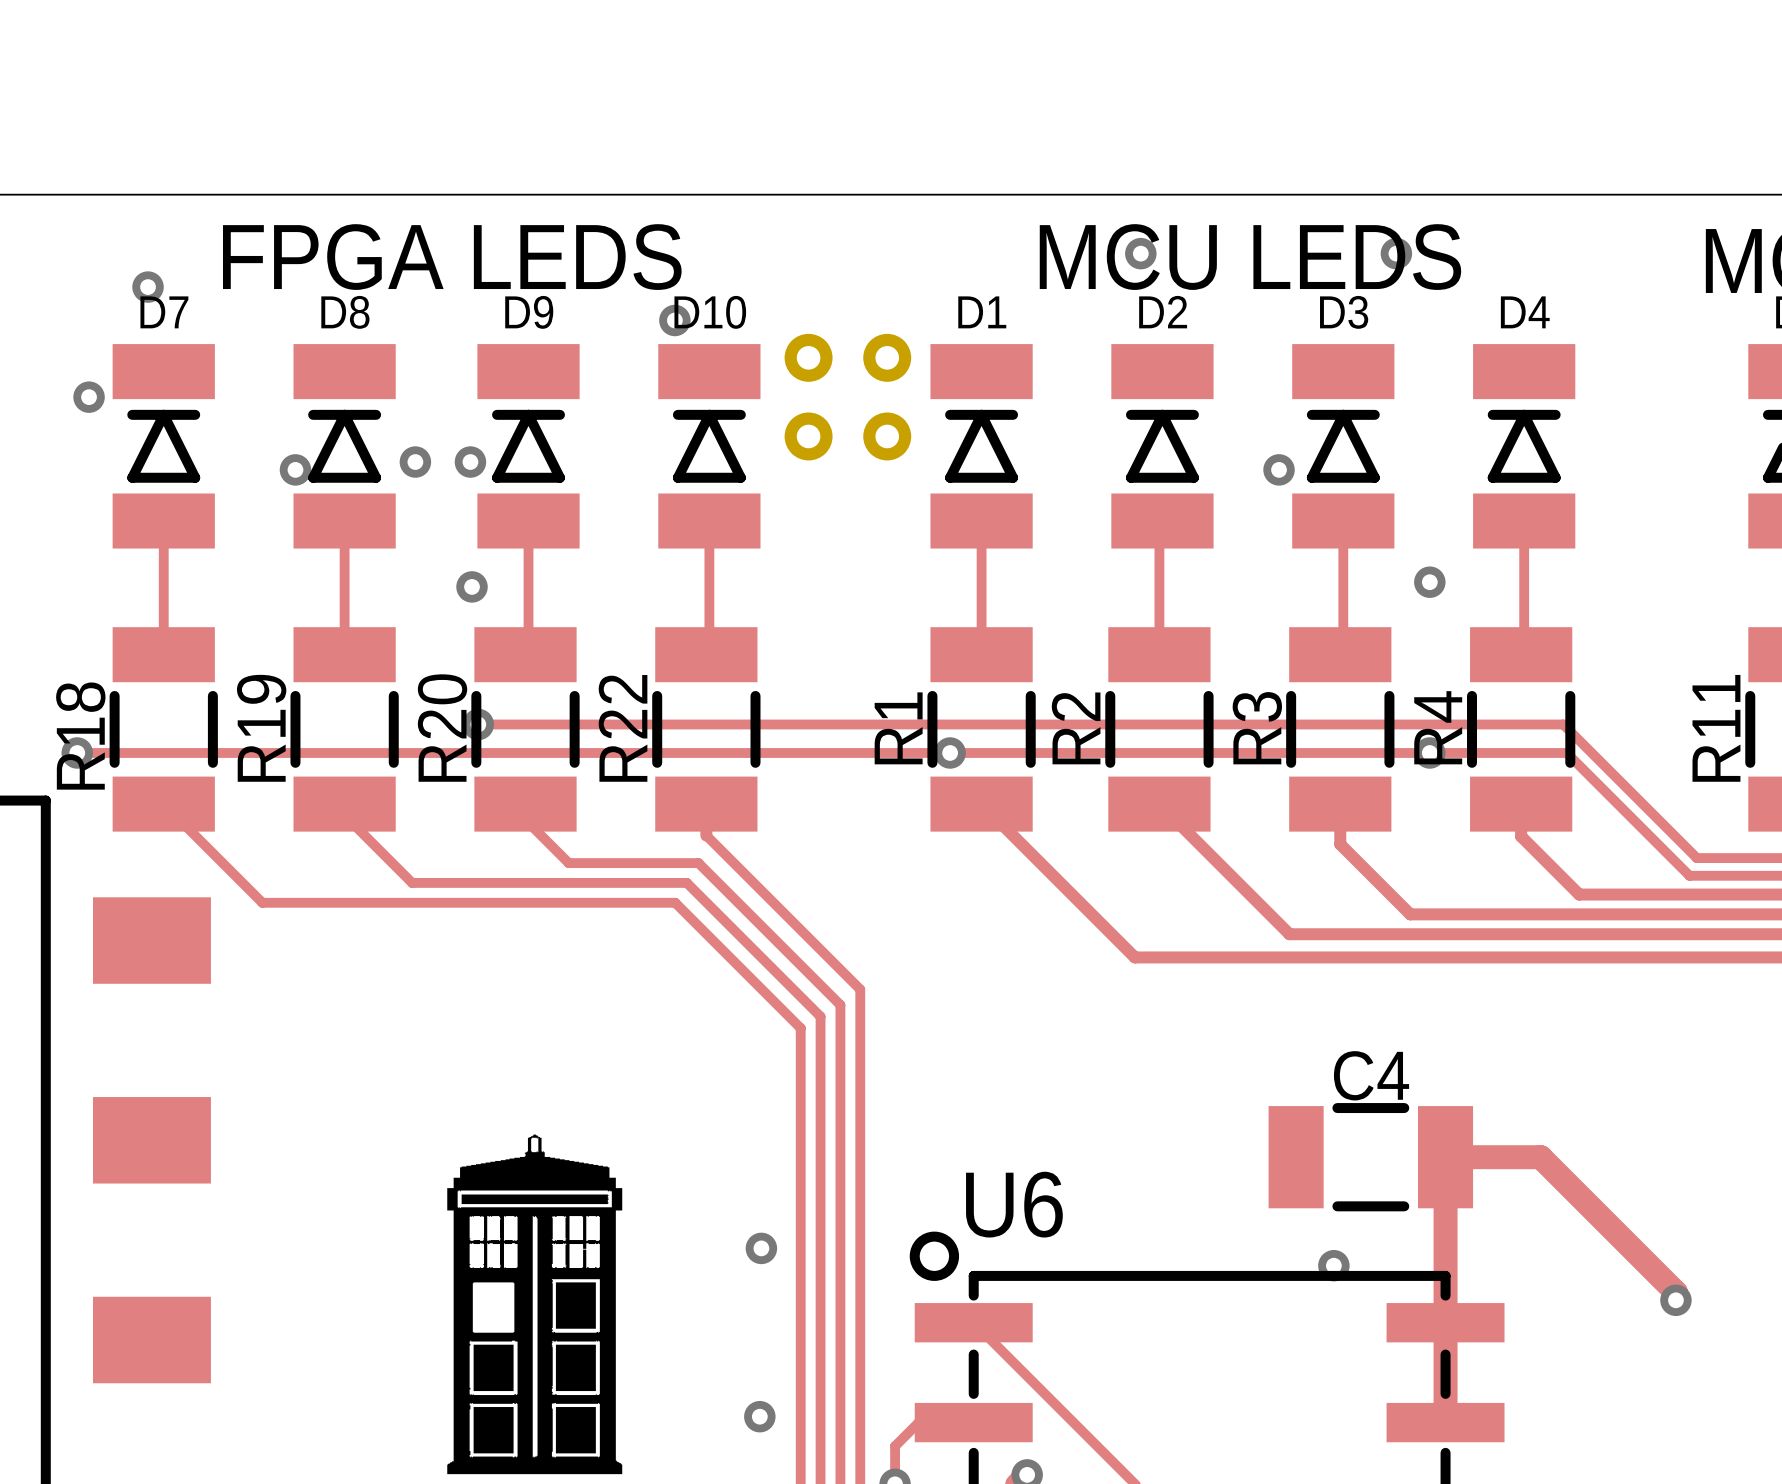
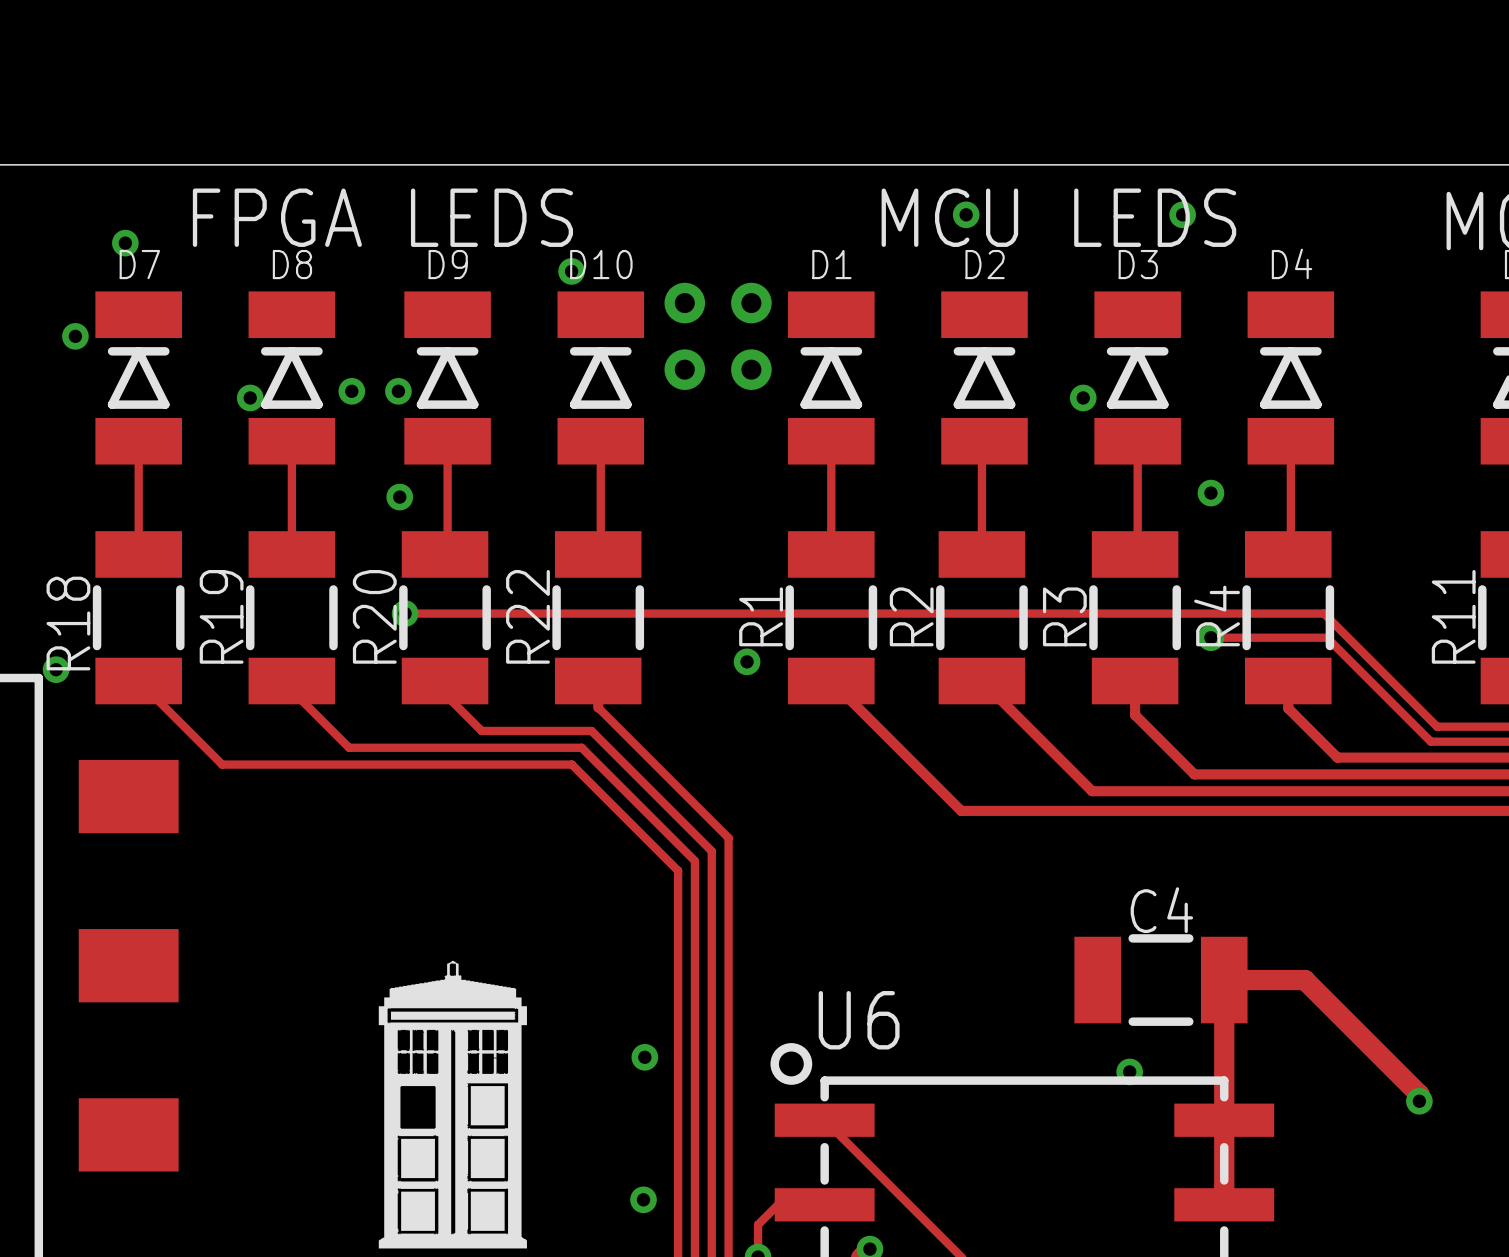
track: (77, 752) (1429, 752) -> none
via position: (77, 752) -> (56, 669)
via position: (950, 752) -> (747, 661)

